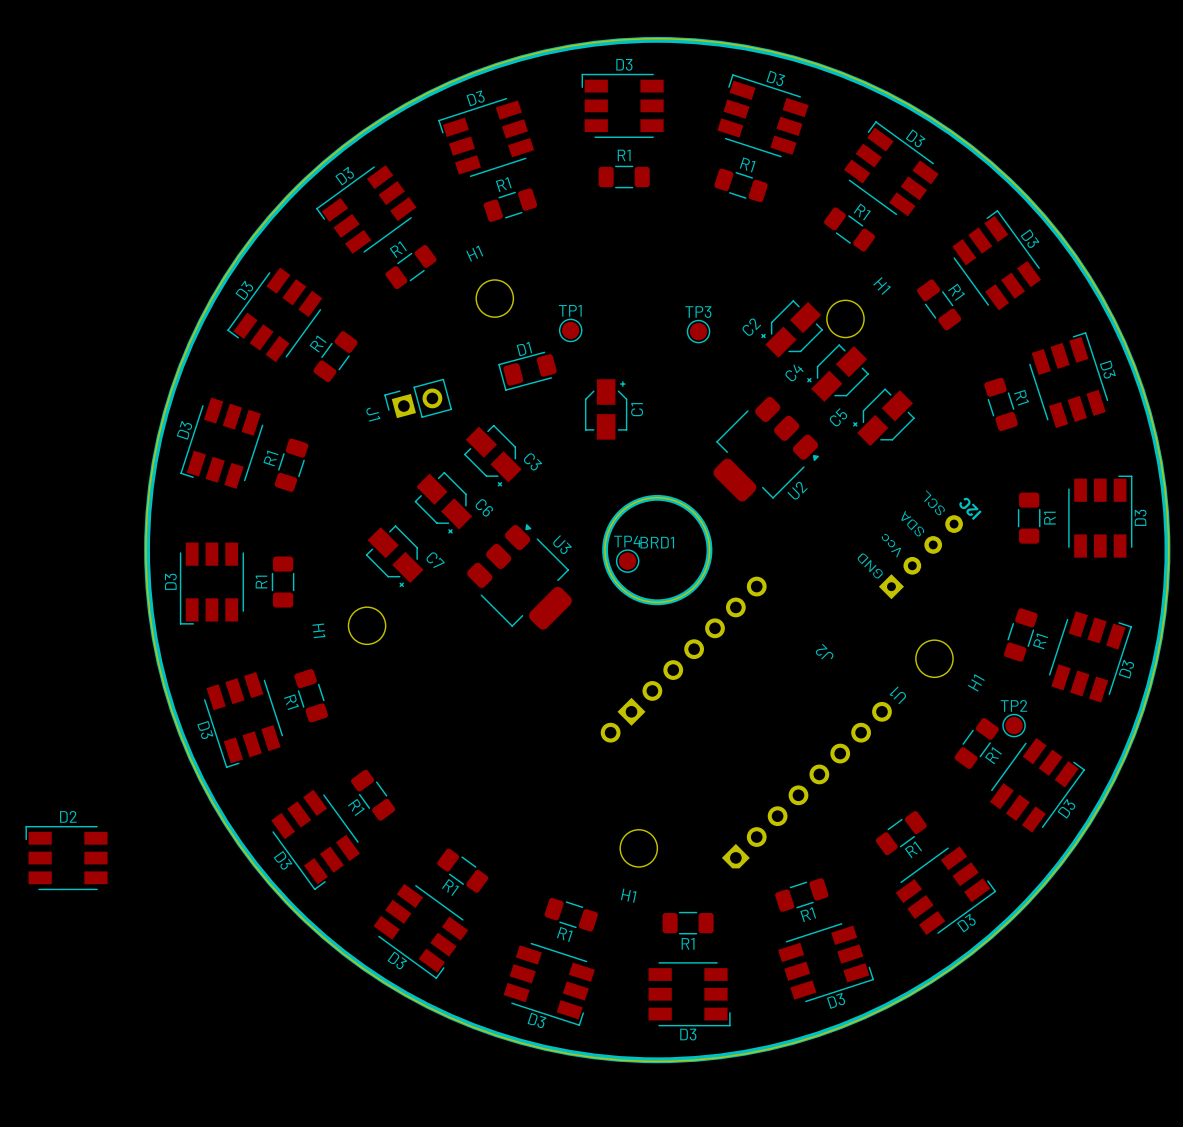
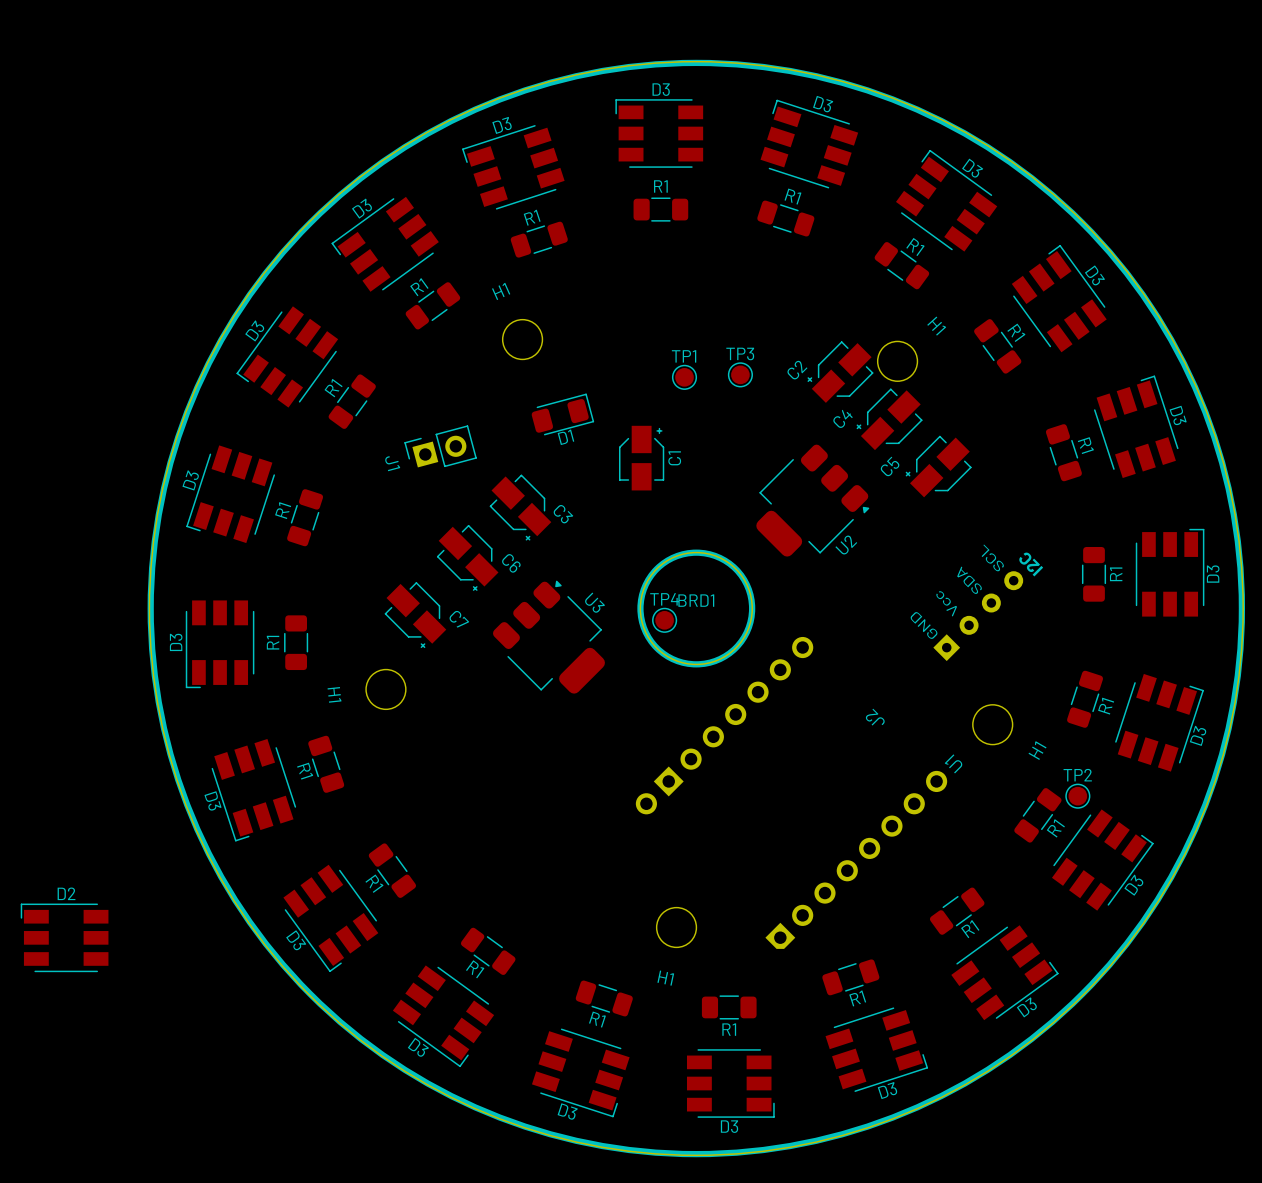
TP1 position: (570, 330) -> (684, 377)
D1 rotation: 0° (527, 371) -> 180° (562, 414)

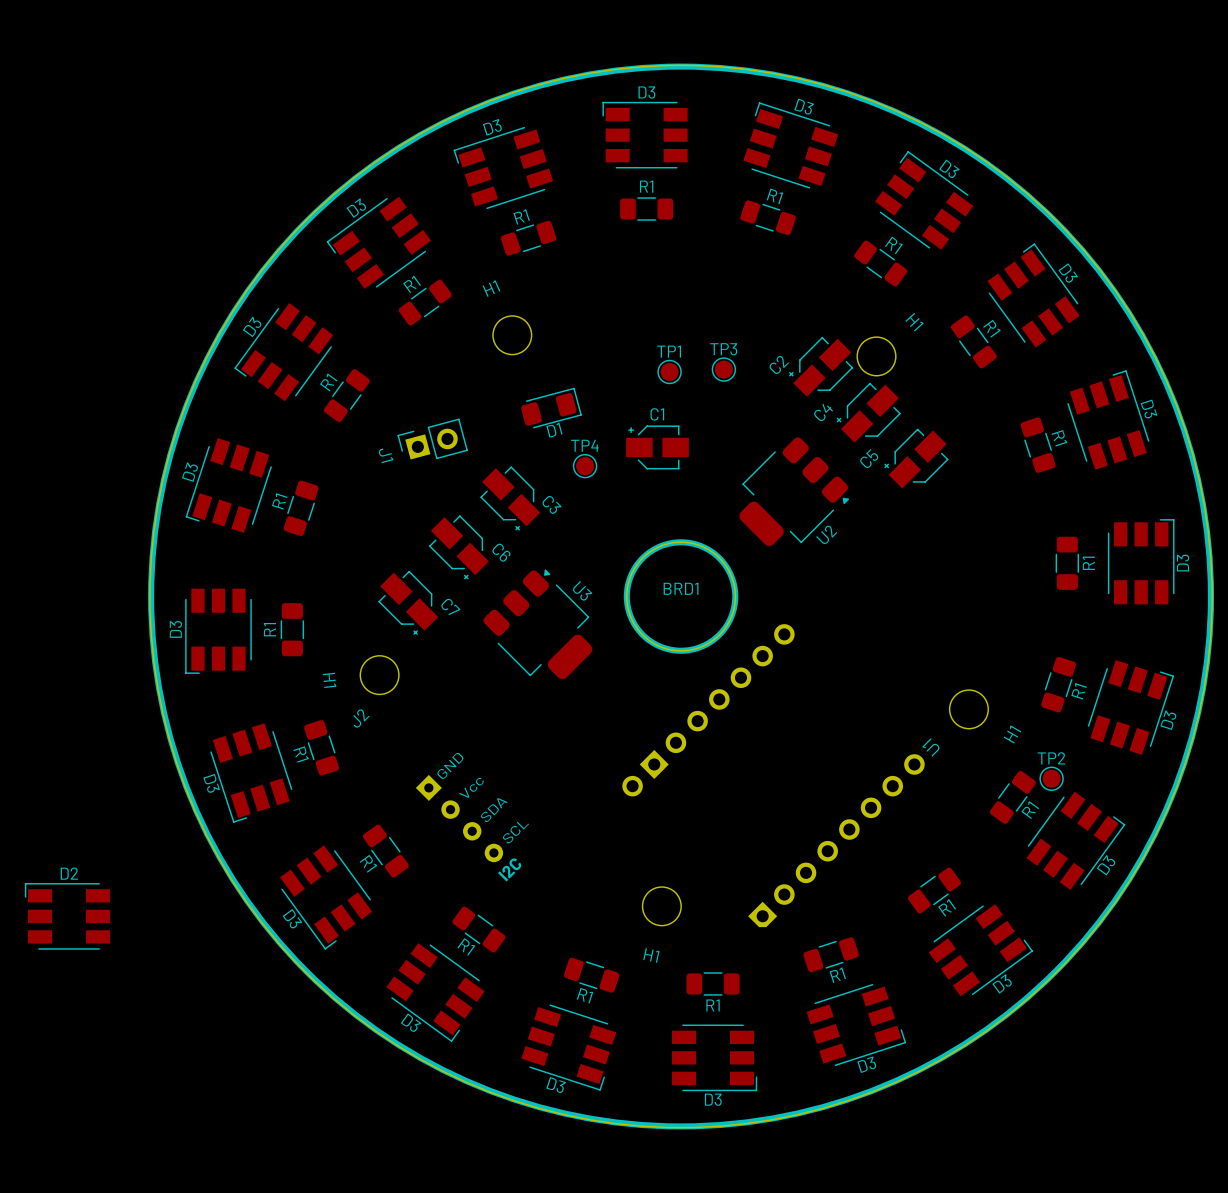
C1 rotation: 0° (641, 458) -> 90° counterclockwise (657, 447)
J2 rotation: 0° (978, 616) -> 90° clockwise (459, 818)
J2 position: (978, 616) -> (459, 818)
TP4 position: (664, 620) -> (585, 466)

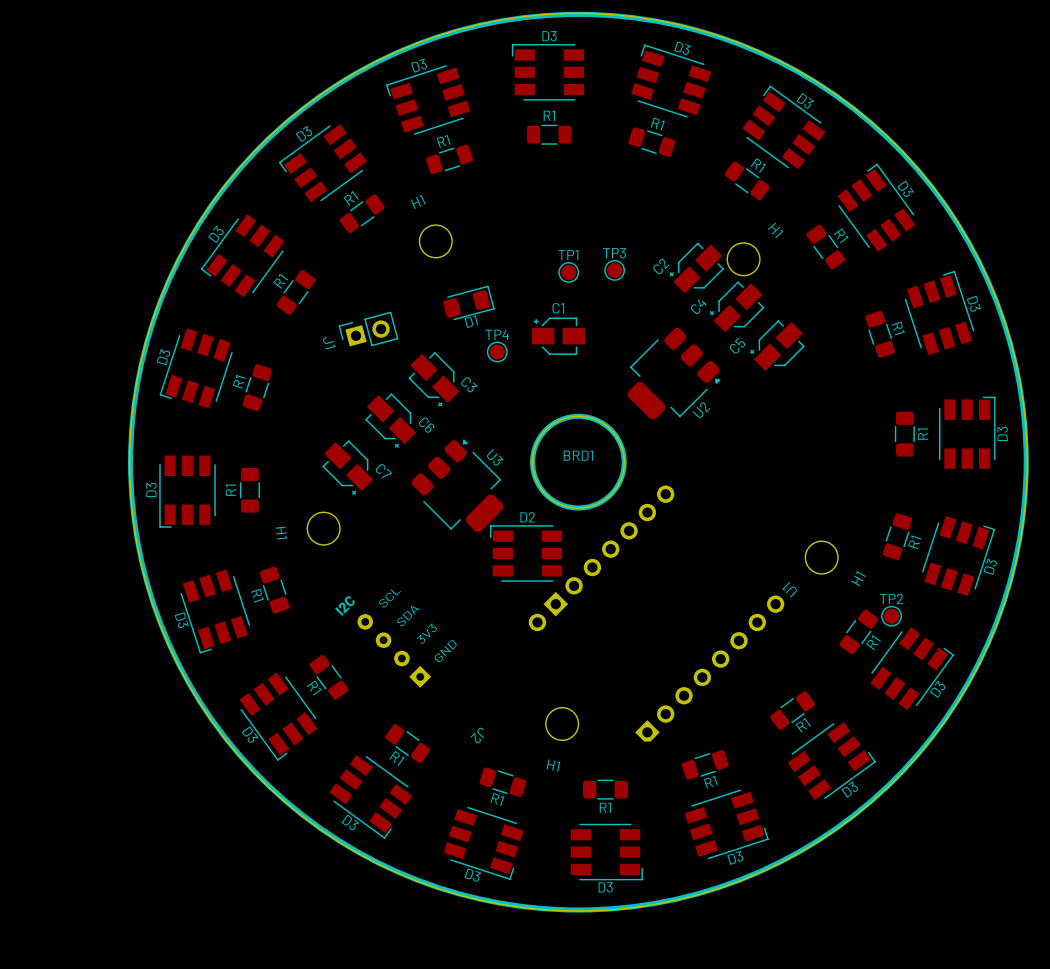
J2 name position: J2 (361, 718) -> J2 (477, 735)
J2 footprint: [415, 774, 504, 863] -> [357, 614, 432, 688]
D2 position: (67, 916) -> (526, 553)

